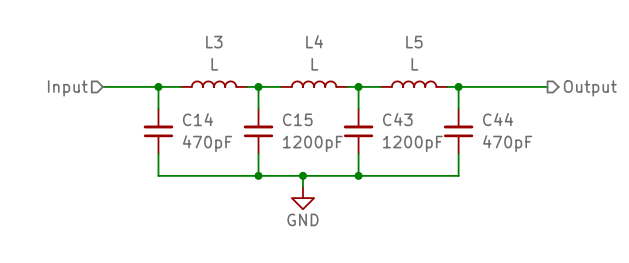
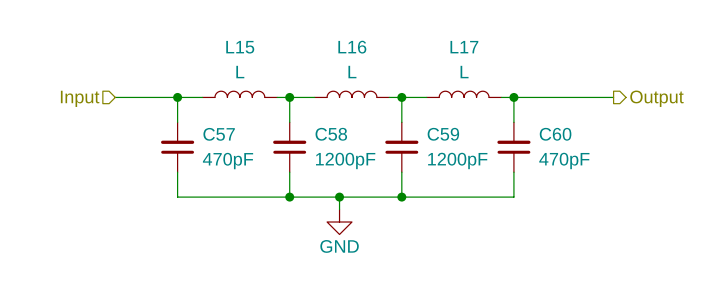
L4 name: L4 (314, 41) -> L16 (352, 47)
L3 name: L3 (214, 42) -> L15 (240, 47)
L5 name: L5 (414, 42) -> L17 (464, 47)
C14 name: C14 (197, 119) -> C57 (219, 134)
C15 name: C15 (297, 119) -> C58 (331, 134)
C43 name: C43 (397, 119) -> C59 (443, 134)
C44 name: C44 (498, 119) -> C60 (555, 134)

